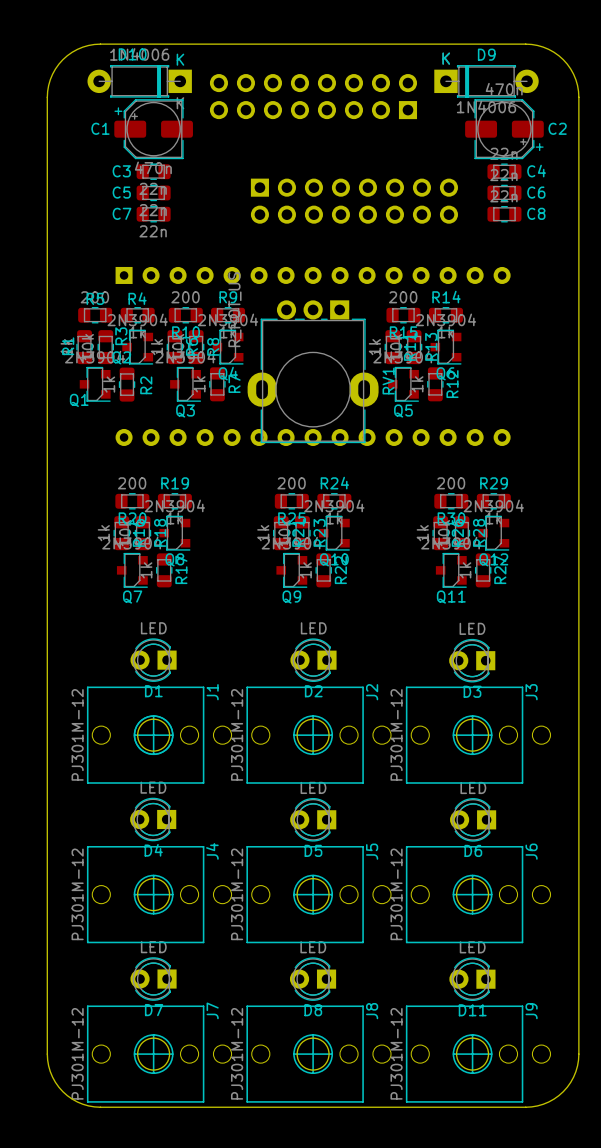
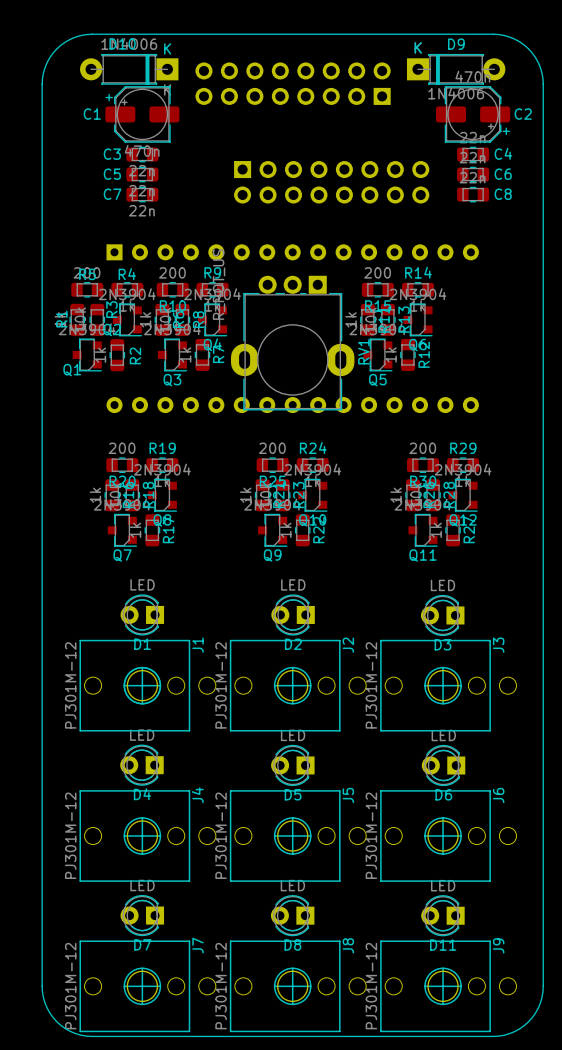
board edge: (100, 44) (531, 44) (554, 52) (563, 59) (573, 74) (578, 97) (578, 1054) (575, 1071) (570, 1082) (563, 1091) (548, 1101) (525, 1107) (100, 1107) (82, 1104) (72, 1099) (62, 1091) (52, 1077) (47, 1054) (47, 97) (50, 79) (62, 59) (77, 49) (100, 44) -> none
line: none -> (92, 34) (498, 34) (519, 41) (528, 48) (538, 62) (543, 84) (543, 986) (540, 1002) (535, 1012) (528, 1021) (514, 1031) (493, 1036) (92, 1036) (75, 1033) (65, 1028) (56, 1021) (47, 1008) (42, 986) (42, 84) (44, 67) (56, 48) (70, 39) (92, 34)

